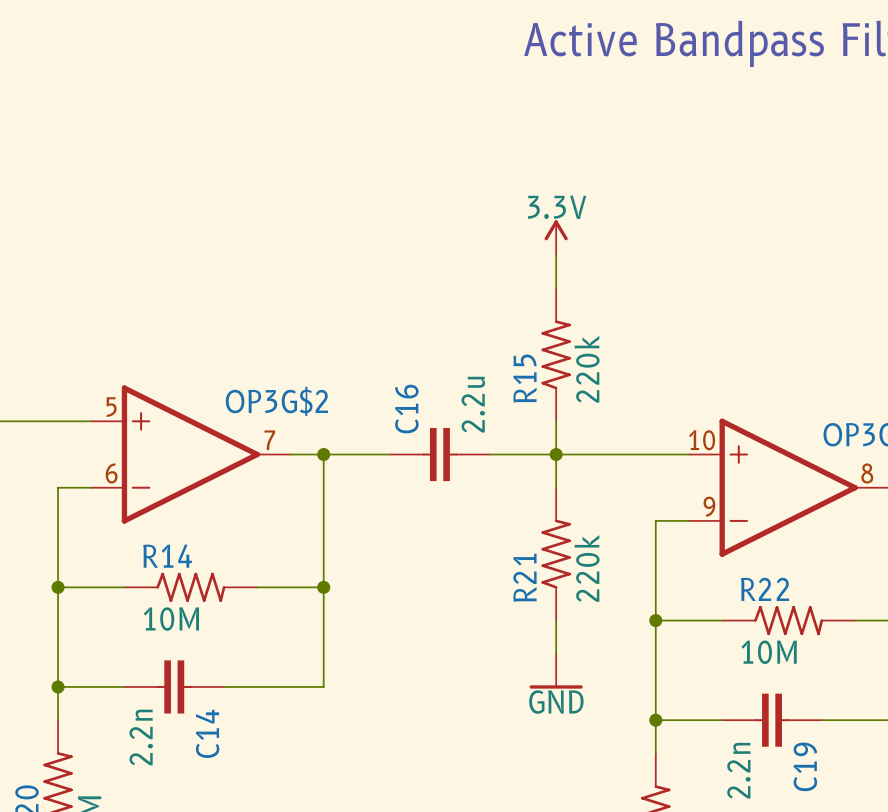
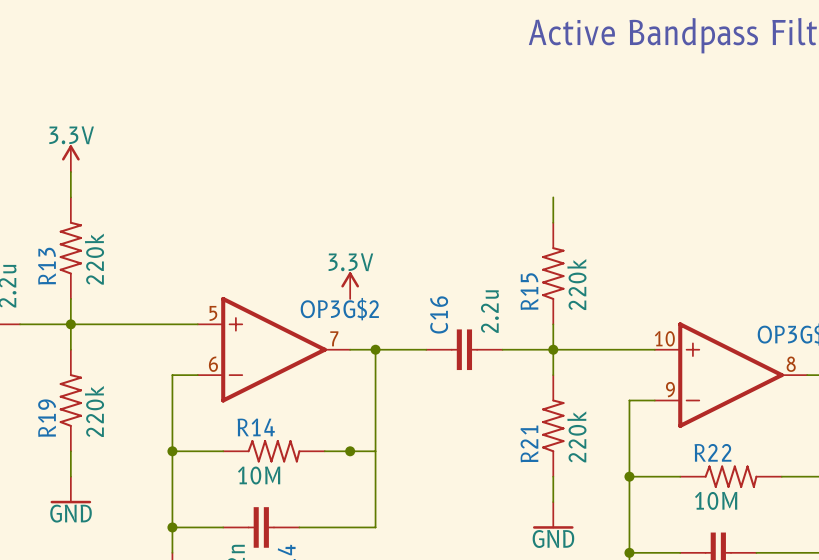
power symbol position: 3.3V (556, 237) -> 3.3V (350, 285)
junction position: (323, 587) -> (350, 451)

